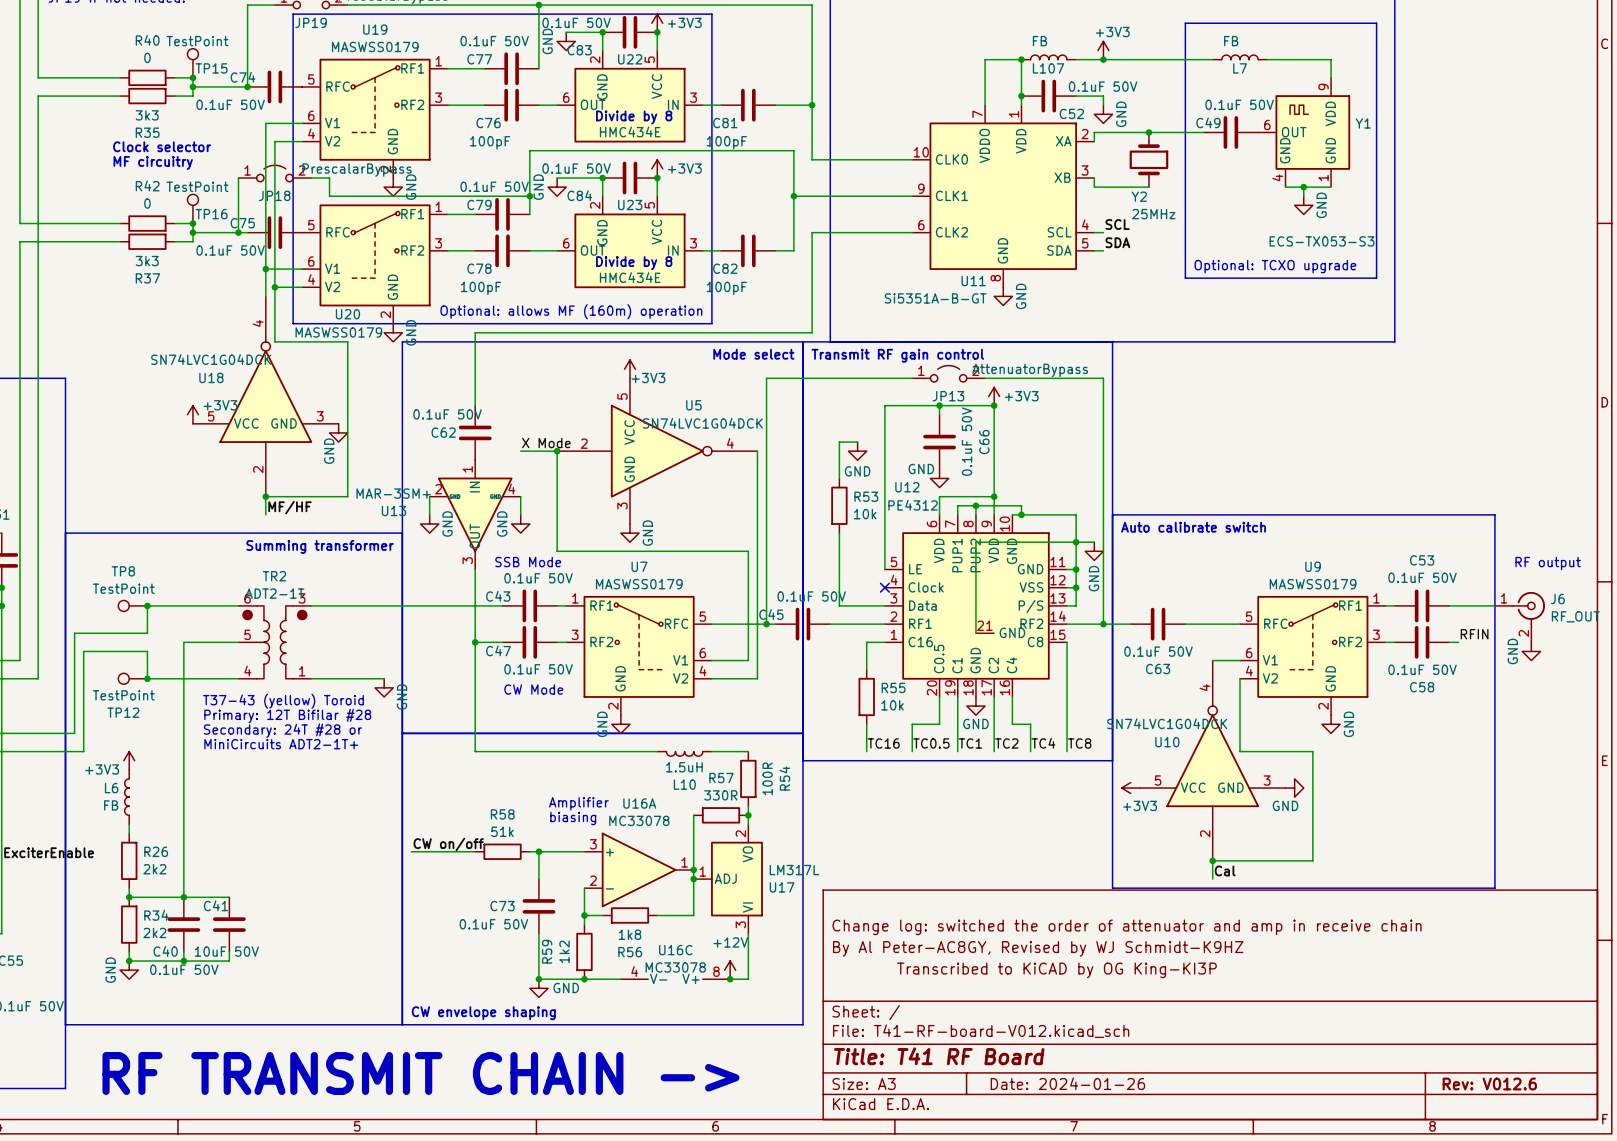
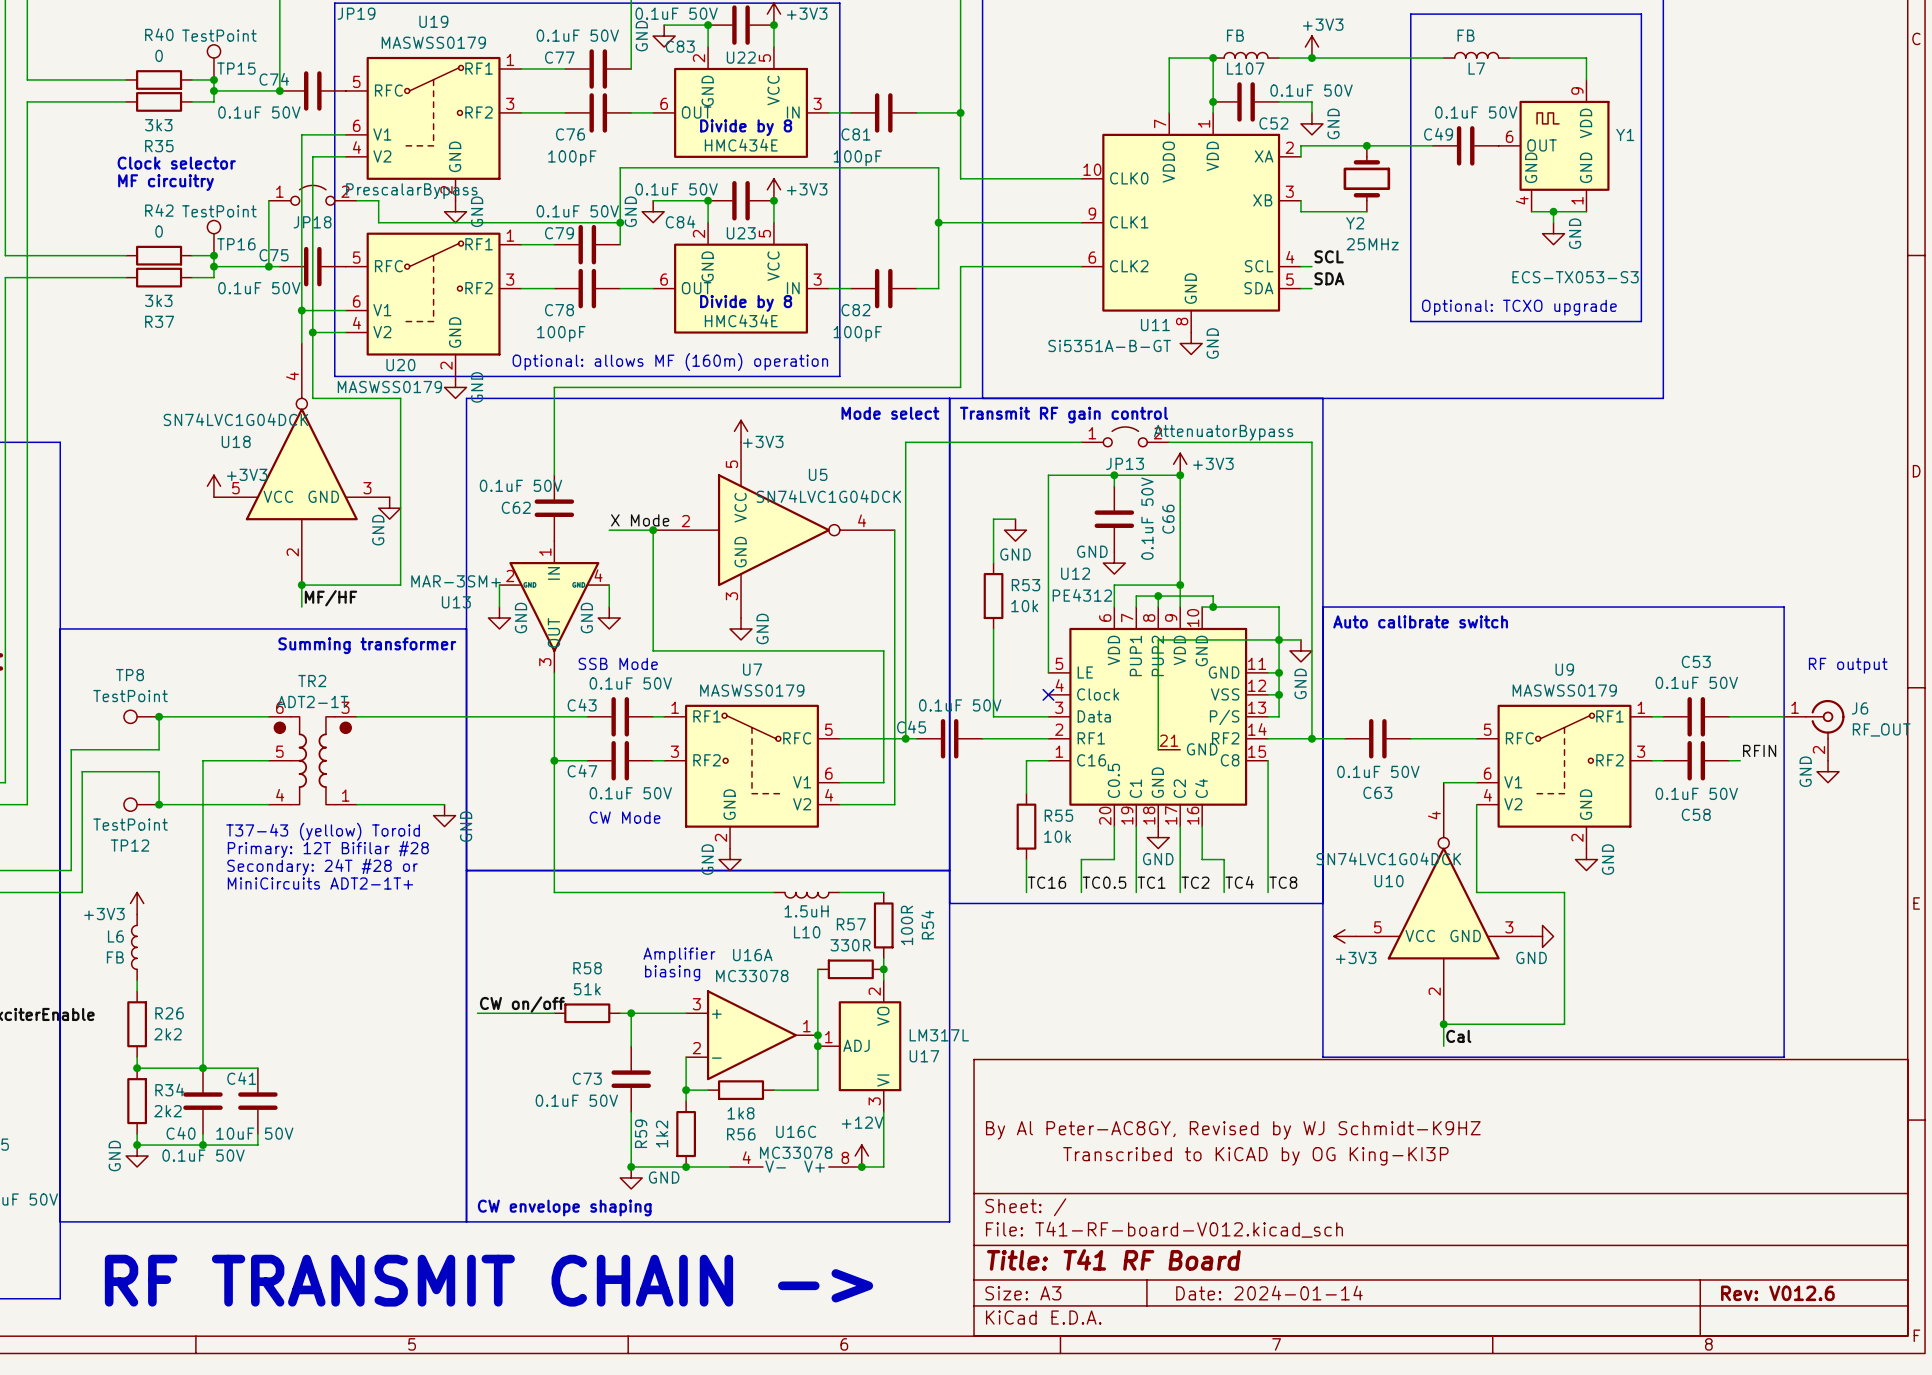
title block: Change log: switched the order of attenuator and amp in receive chain (1127, 927) -> none
title block: Date: 2024-01-26 (1067, 1083) -> Date: 2024-01-14 (1269, 1293)

